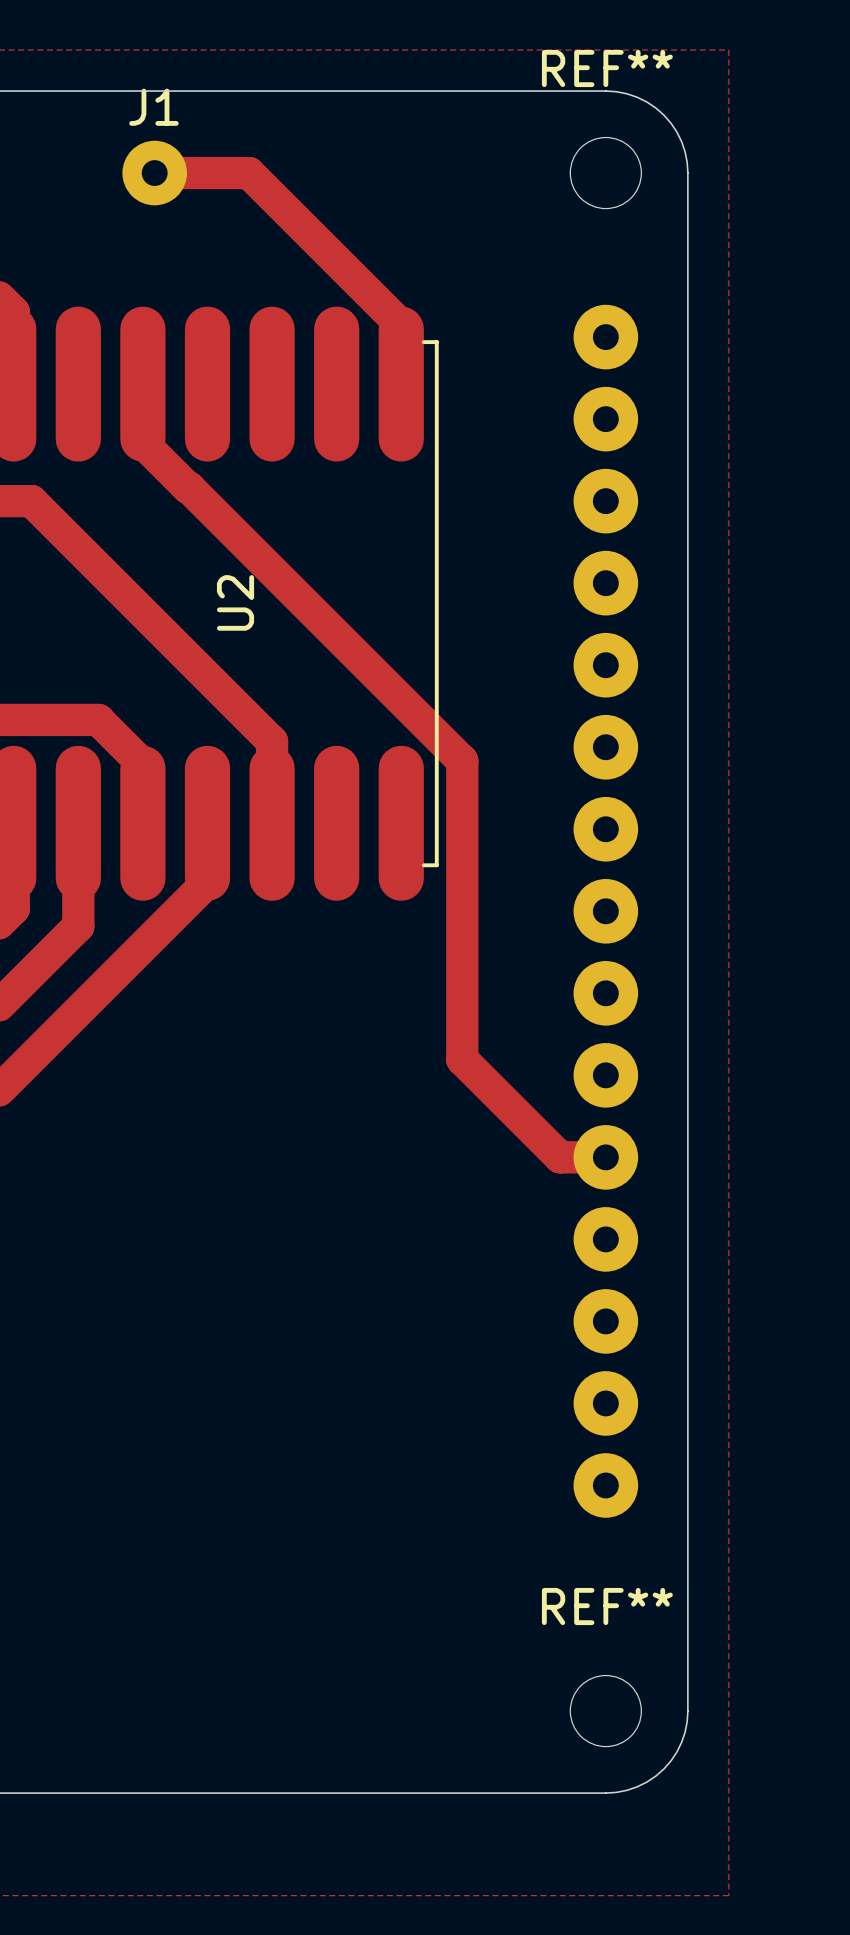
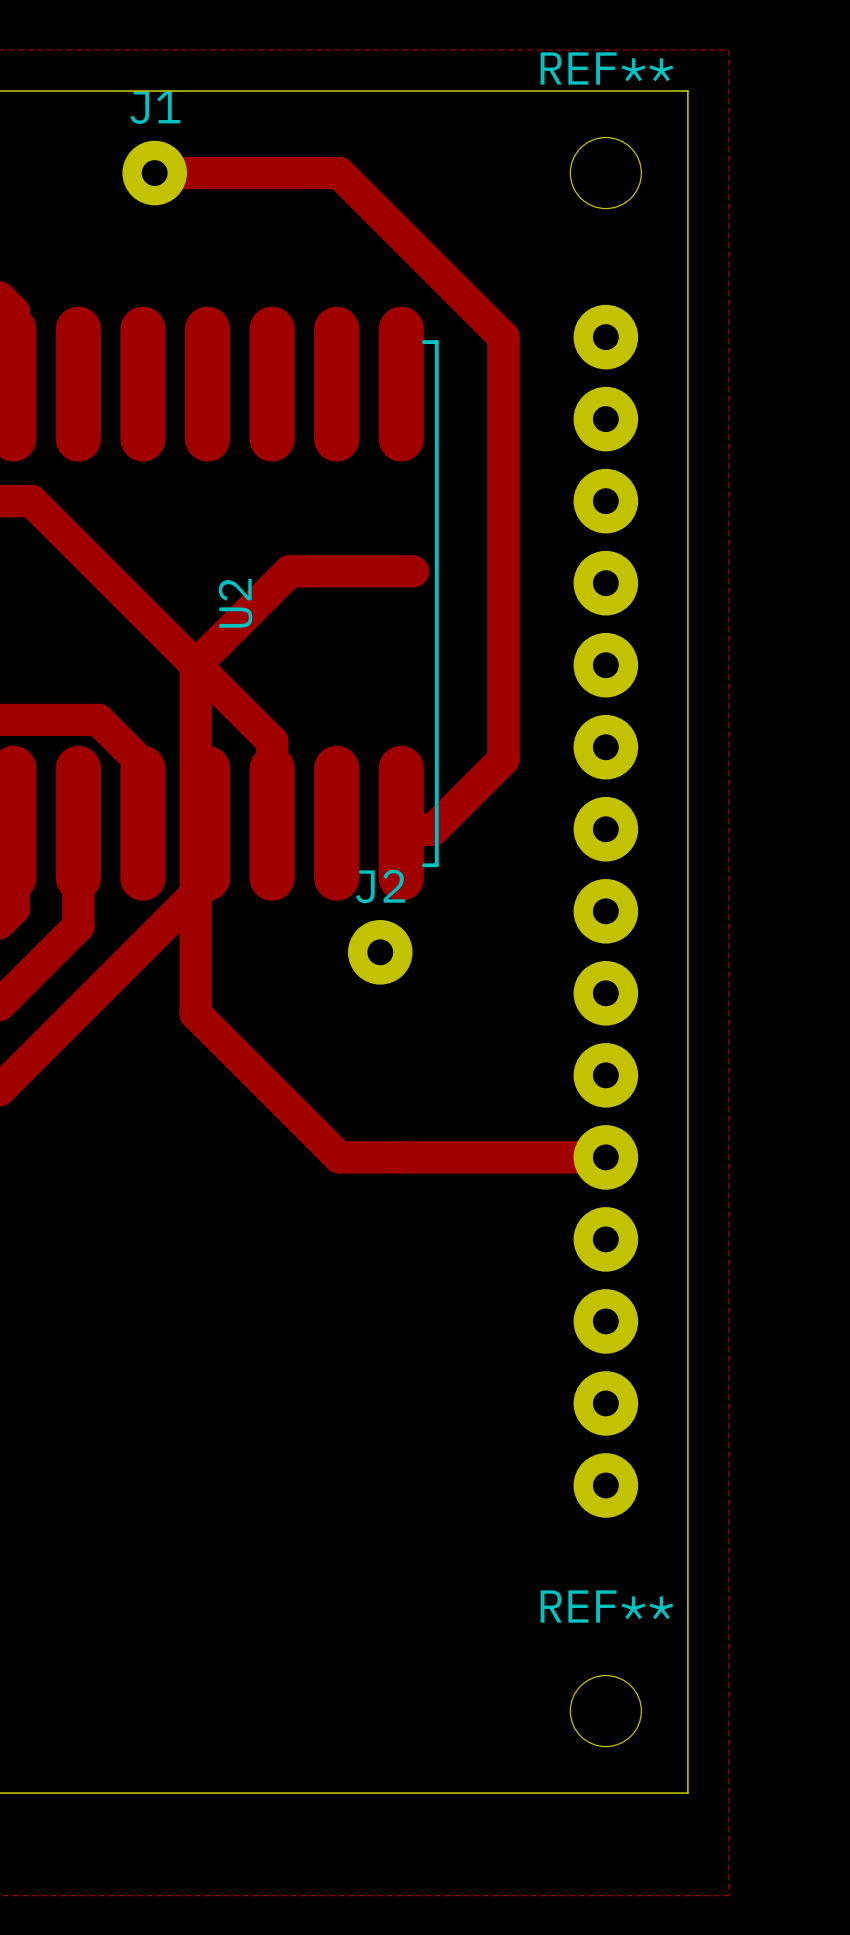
board edge: (605, 91) (637, 97) (663, 115) (681, 141) (687, 173) -> (605, 91) (687, 91) (687, 173)
track: (249, 173) (401, 325) (401, 345) -> (249, 173) (339, 173) (503, 337) (503, 759) (433, 829) (413, 829)
track: (142, 345) (142, 442) (462, 760) (462, 1059) (560, 1157) -> (413, 571) (289, 571) (195, 665) (195, 1013) (339, 1157) (560, 1157)
J2: none -> (380, 952)
board edge: (687, 1711) (681, 1742) (663, 1769) (637, 1786) (605, 1793) -> (687, 1711) (687, 1793) (605, 1793)

